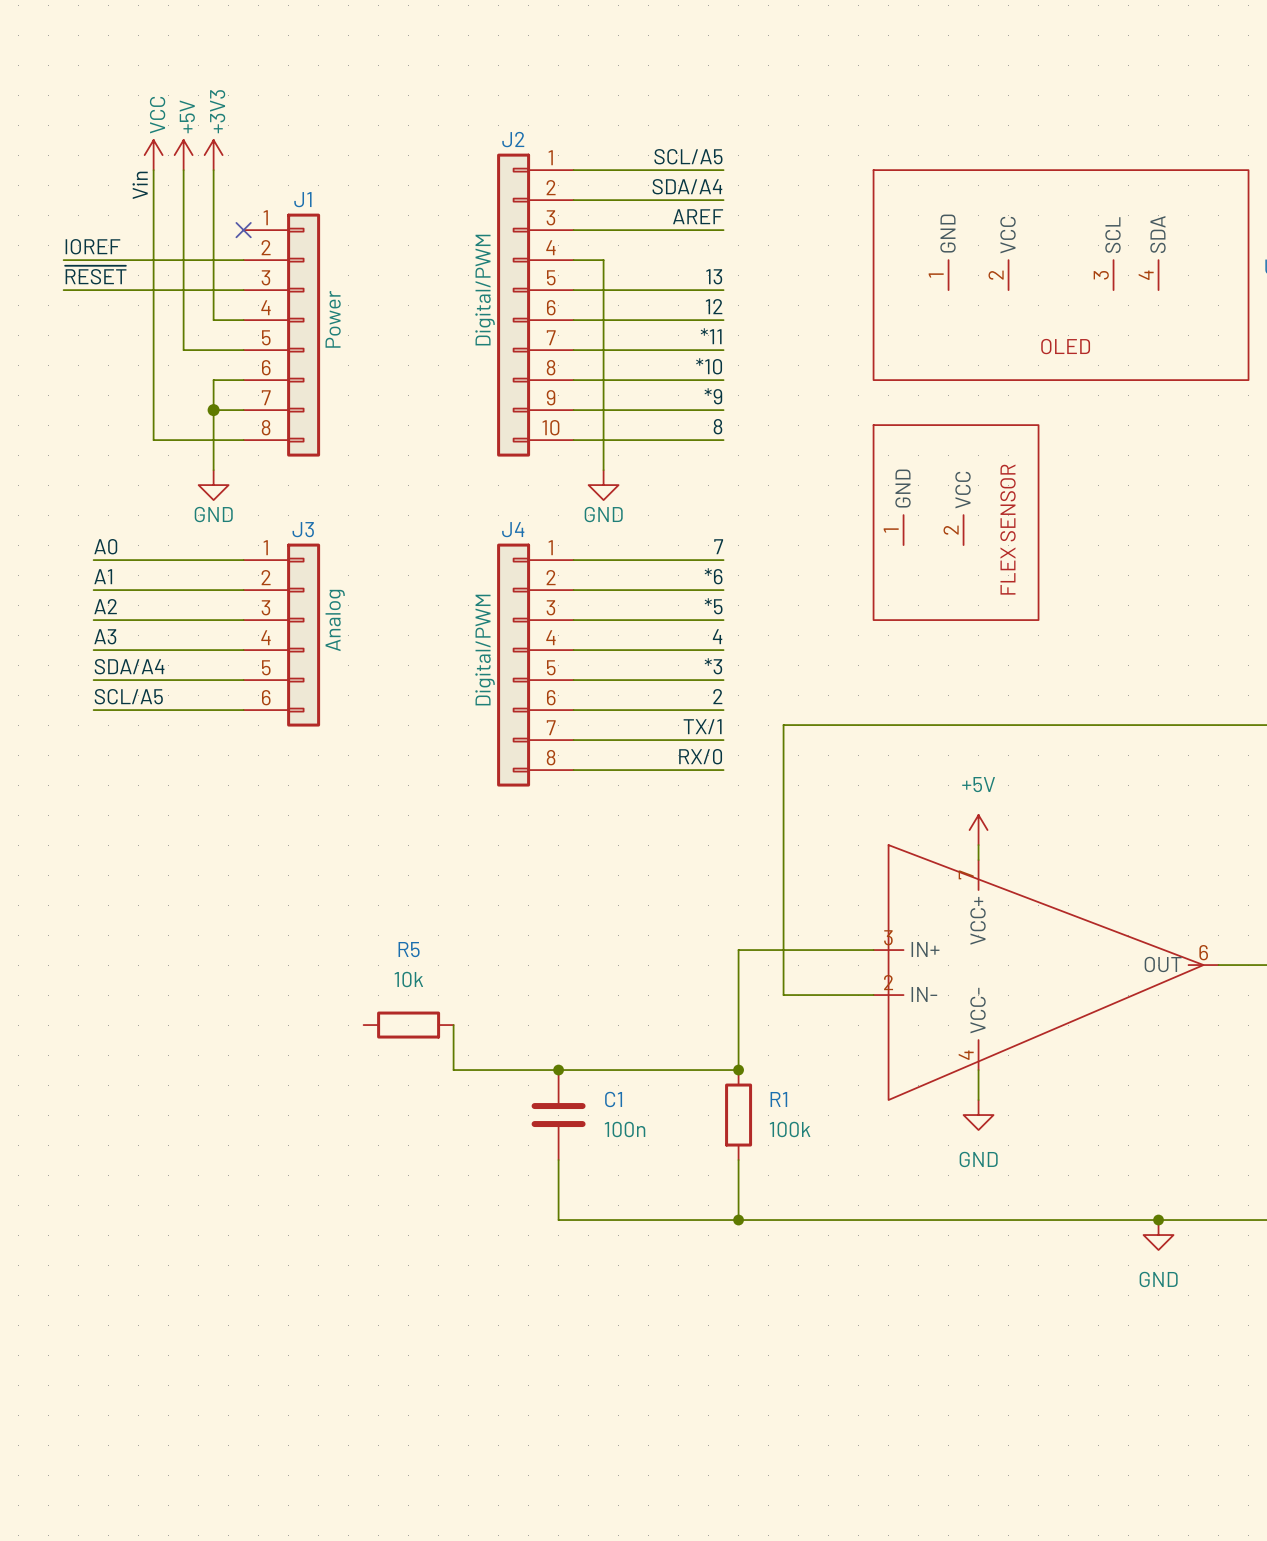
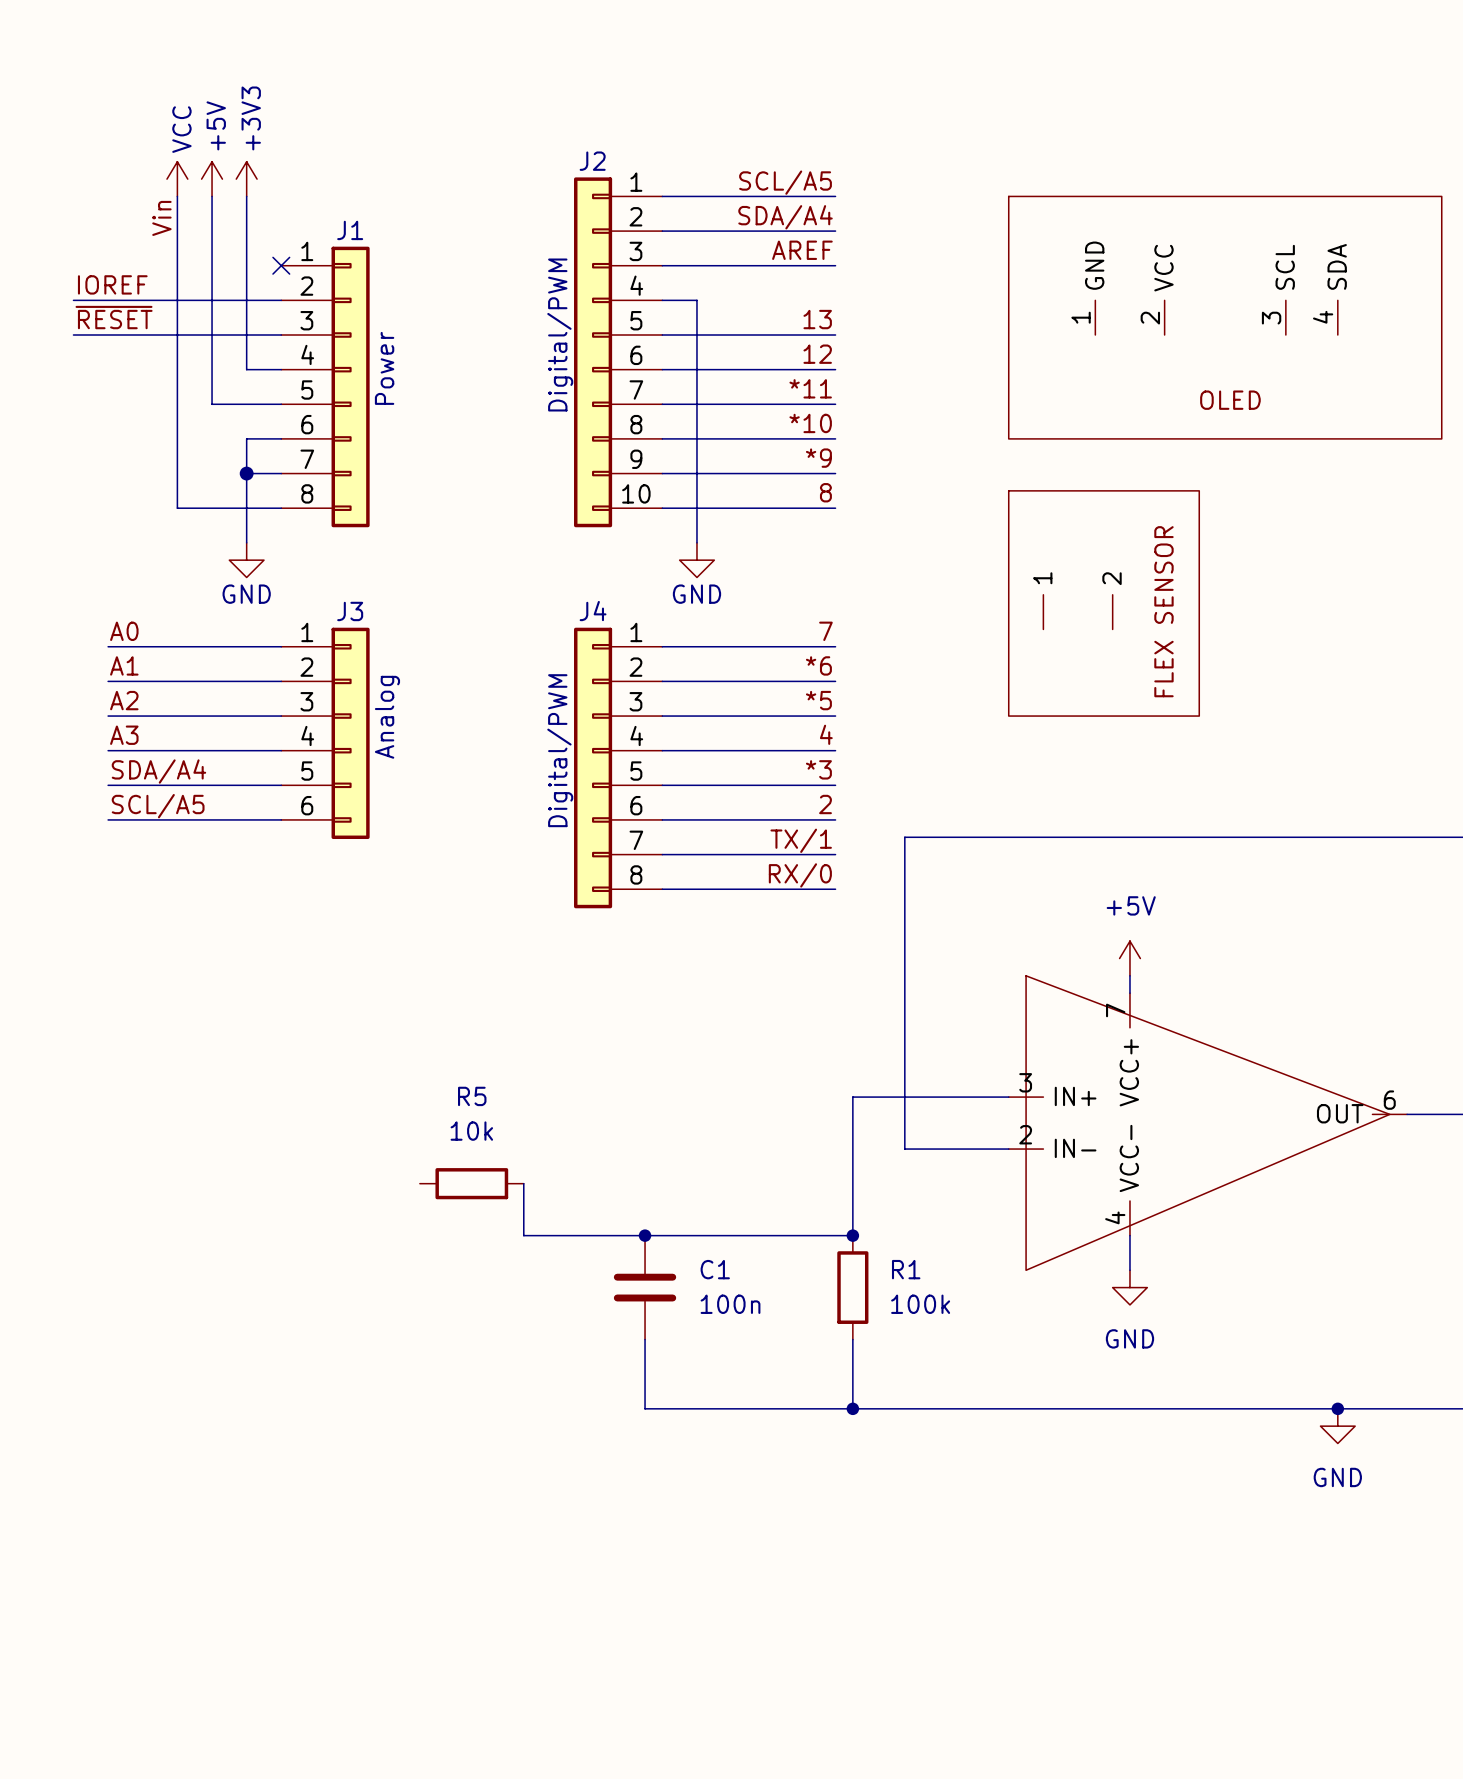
part pin name: GND (902, 488) -> 1 (1042, 578)
part pin name: VCC (963, 490) -> 2 (1112, 578)
part pin number: 1 (891, 530) -> none
part pin number: 2 (951, 530) -> none

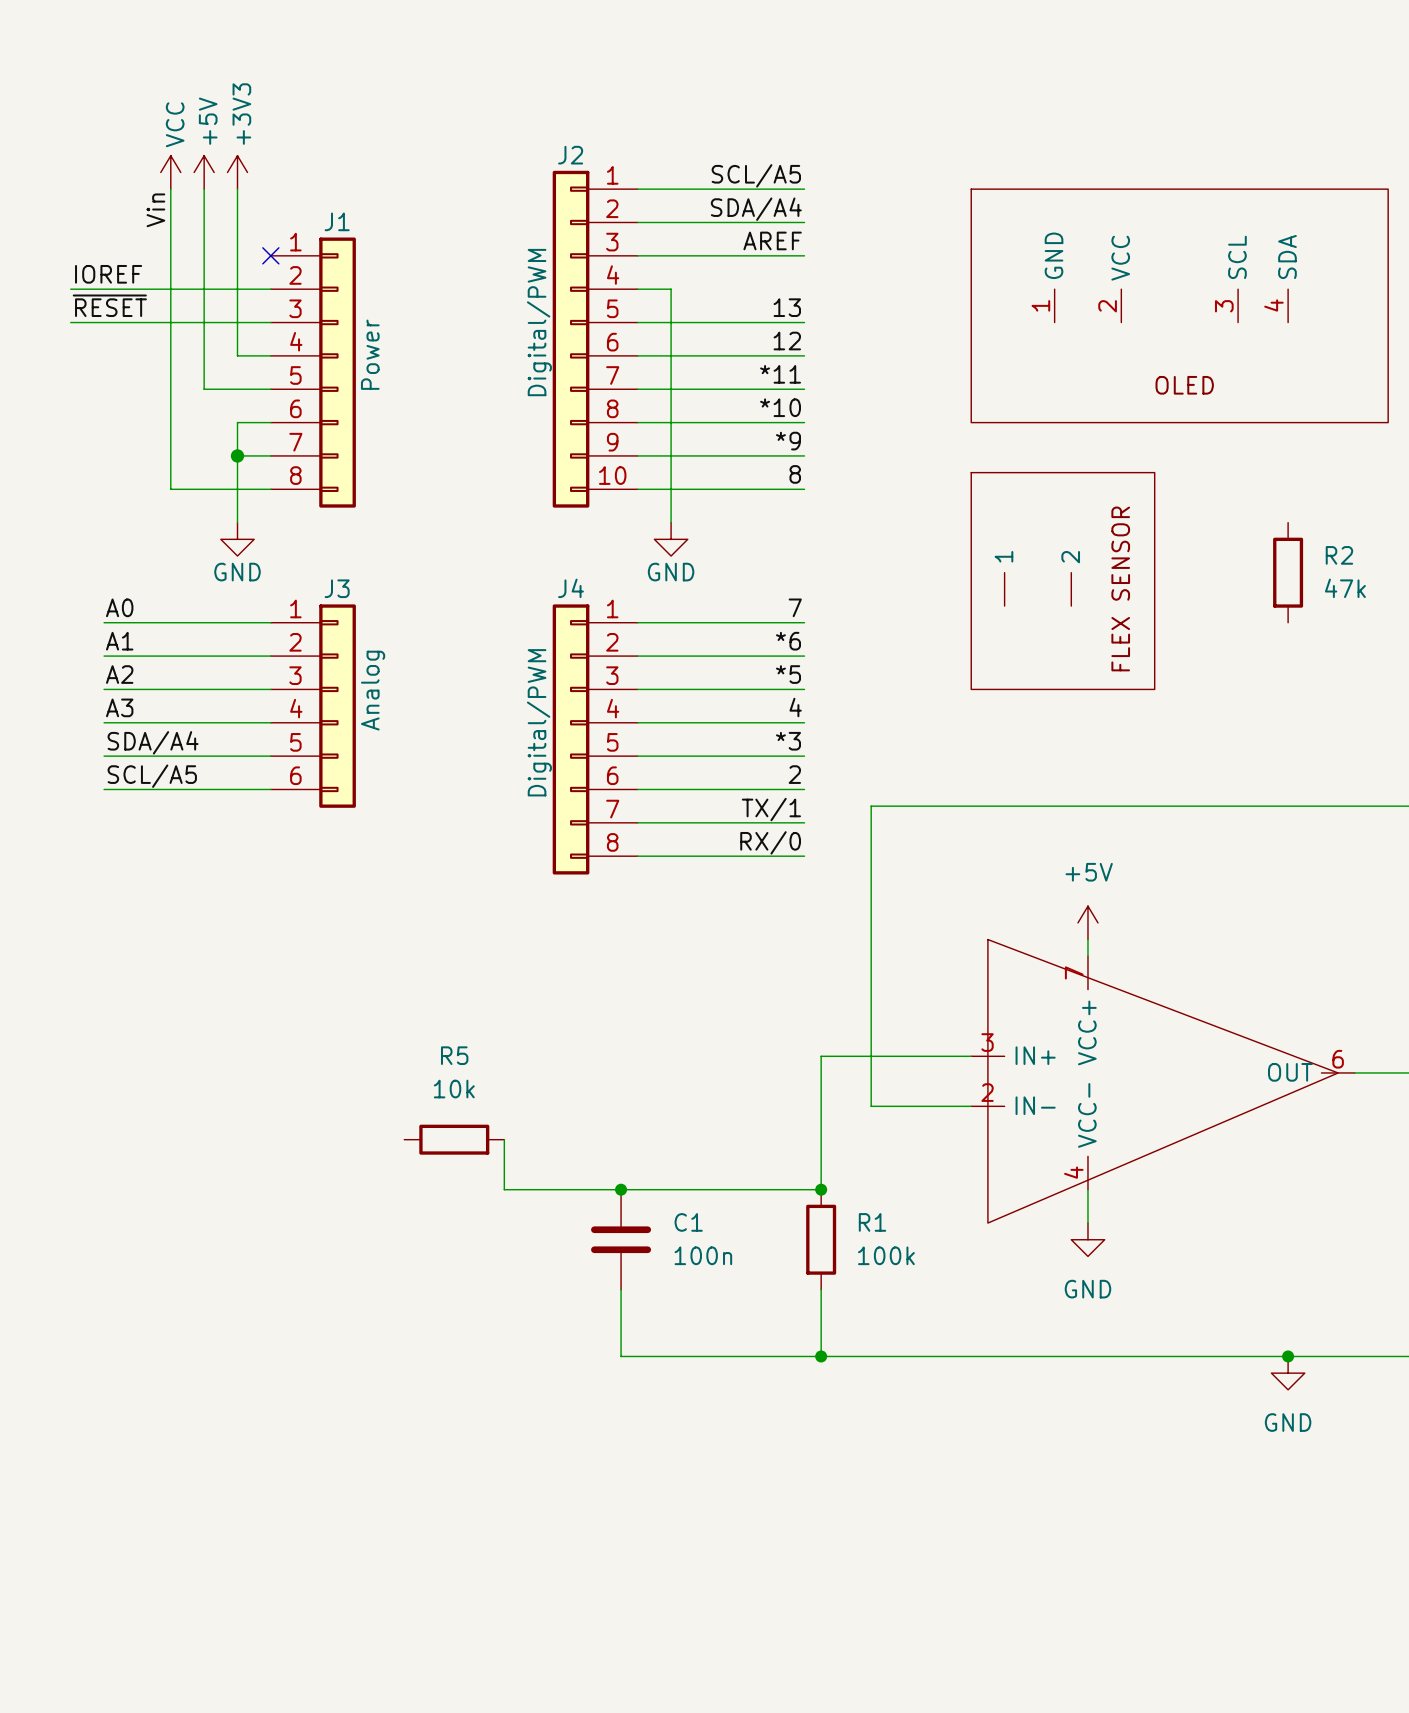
R2: none -> 47k (1288, 572)

